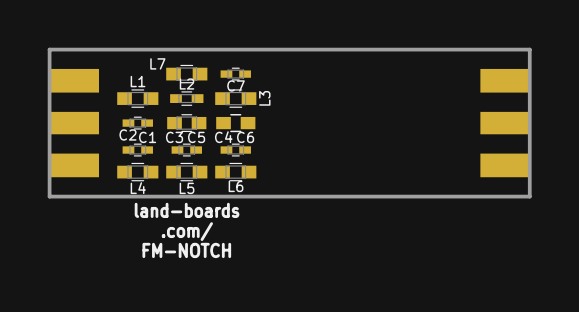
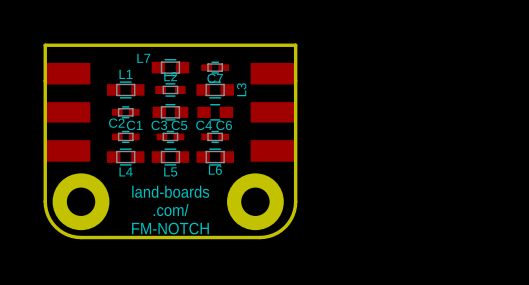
board edge: (323, 49) (529, 49) (529, 196) (49, 196) -> (295, 45) (295, 206) (290, 219) (277, 232) (259, 237) (71, 236) (55, 227) (47, 215) (45, 206) (45, 179)
part position: (505, 123) -> (273, 112)
part: none -> (81, 201)
part: none -> (255, 201)

